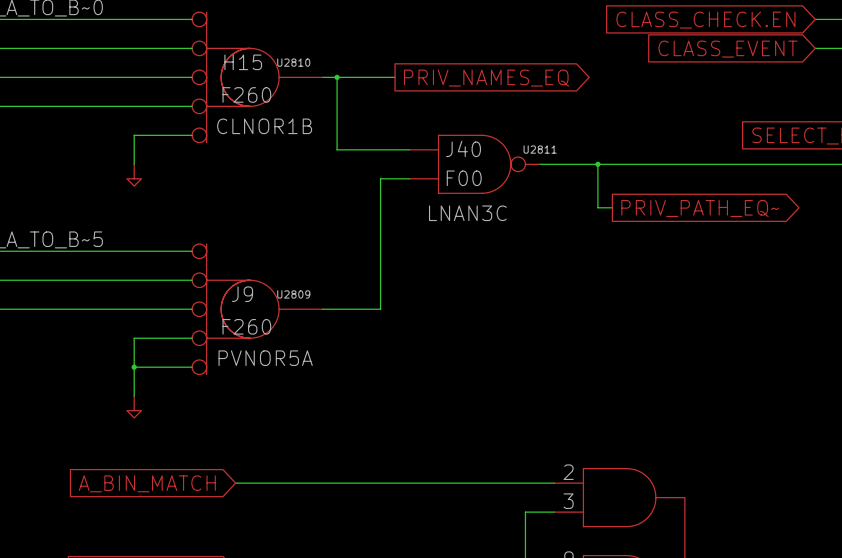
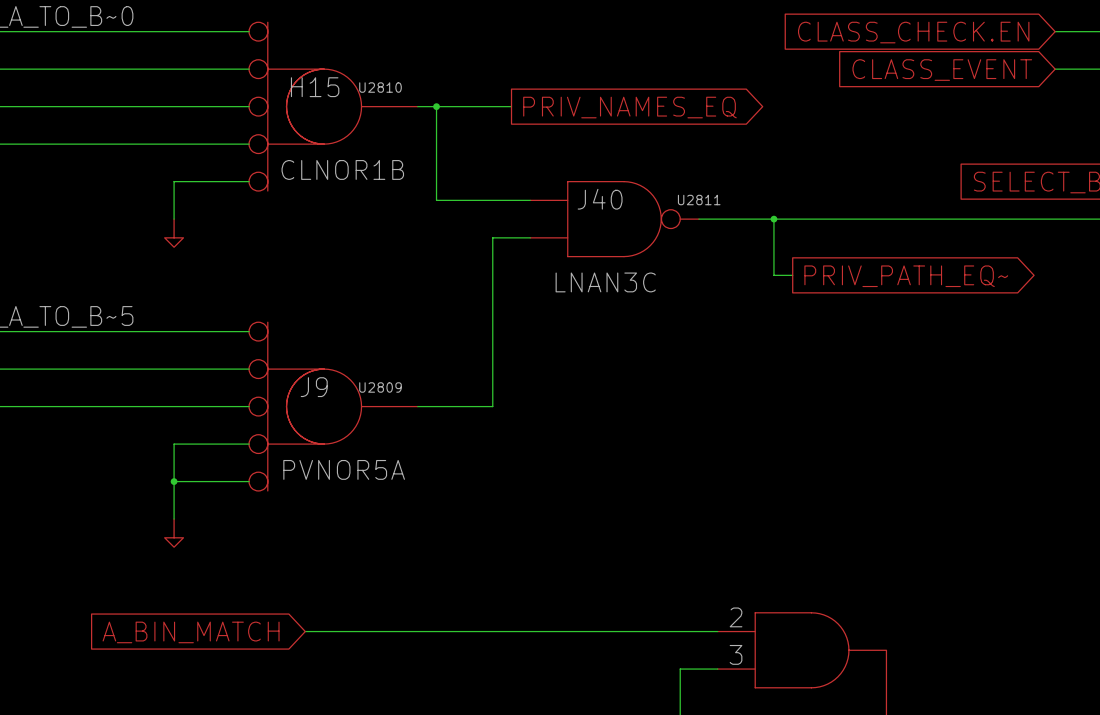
U2810 value: F260 (246, 94) -> none
U2811 value: F00 (464, 178) -> none
U2809 value: F260 (246, 326) -> none

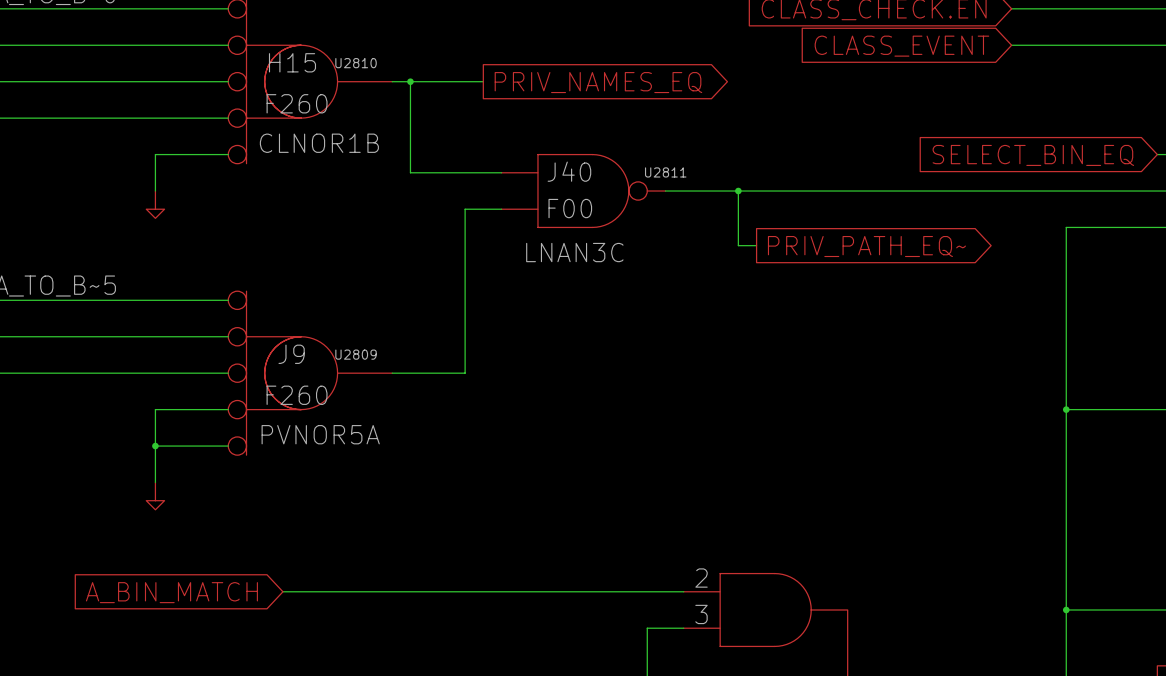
U2810 value: none -> F260 (297, 103)
U2811 value: none -> F00 (570, 208)
U2809 value: none -> F260 (297, 395)

